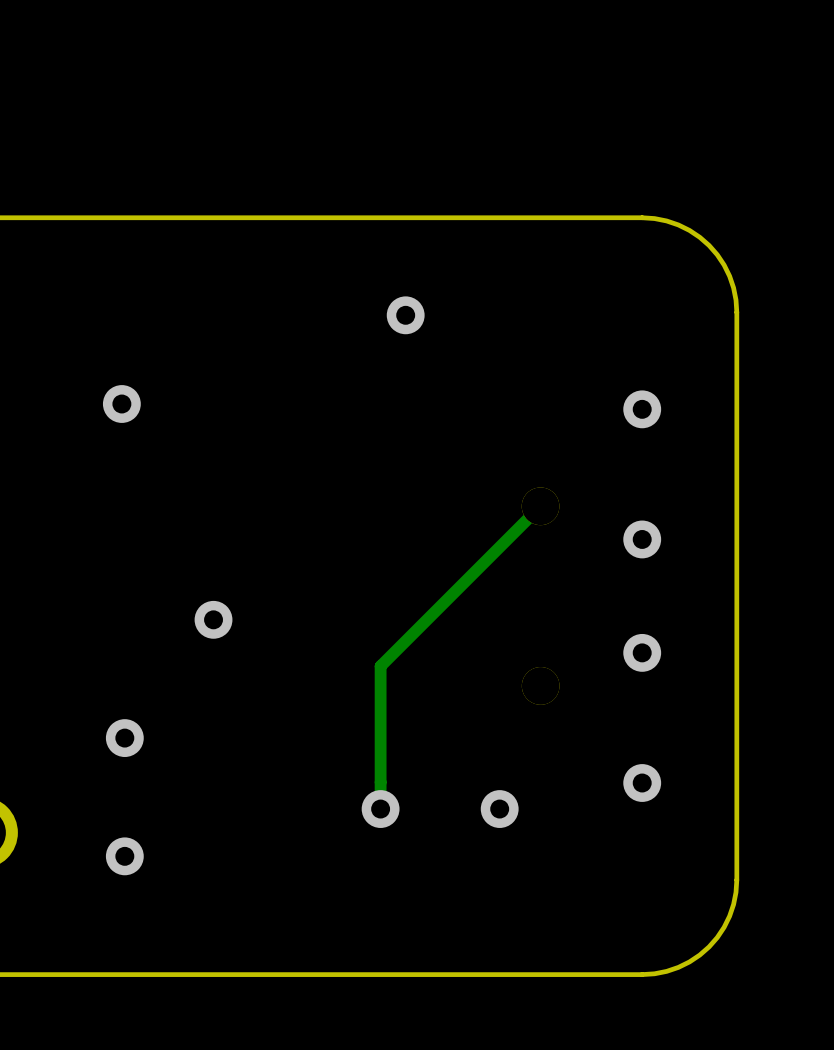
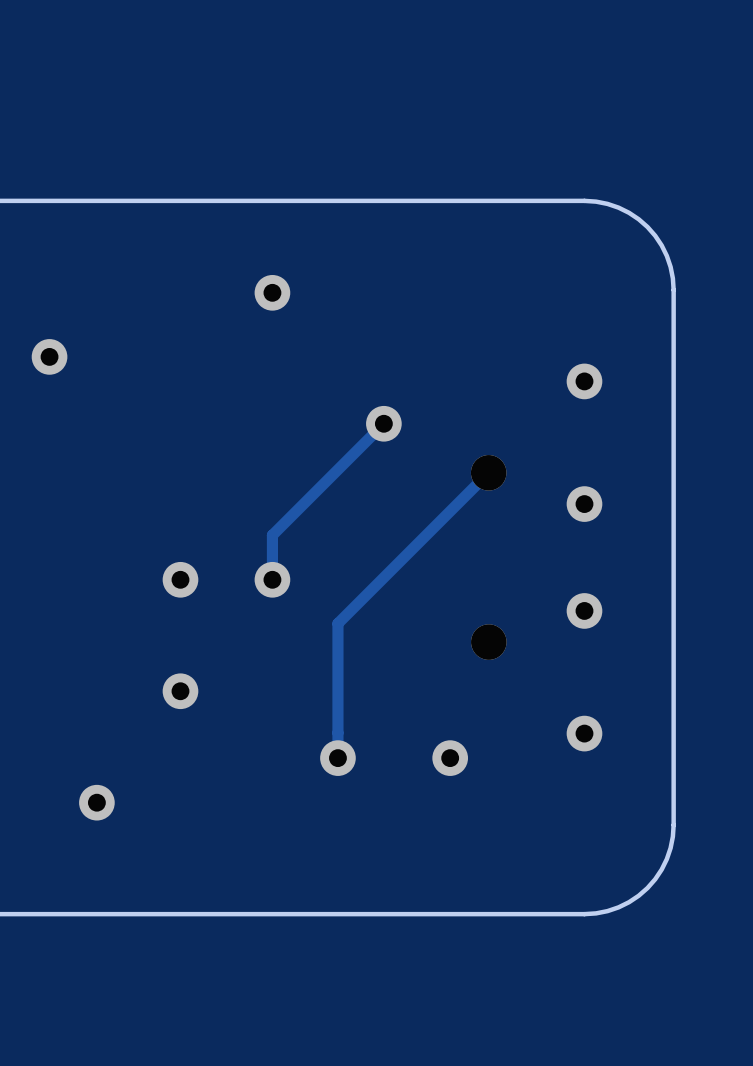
via: none -> (272, 292)
via: (405, 315) -> none
via position: (121, 404) -> (49, 356)
track: none -> (383, 423) (272, 535) (272, 579)
via: none -> (383, 423)
via: none -> (272, 579)
via position: (124, 738) -> (180, 691)

